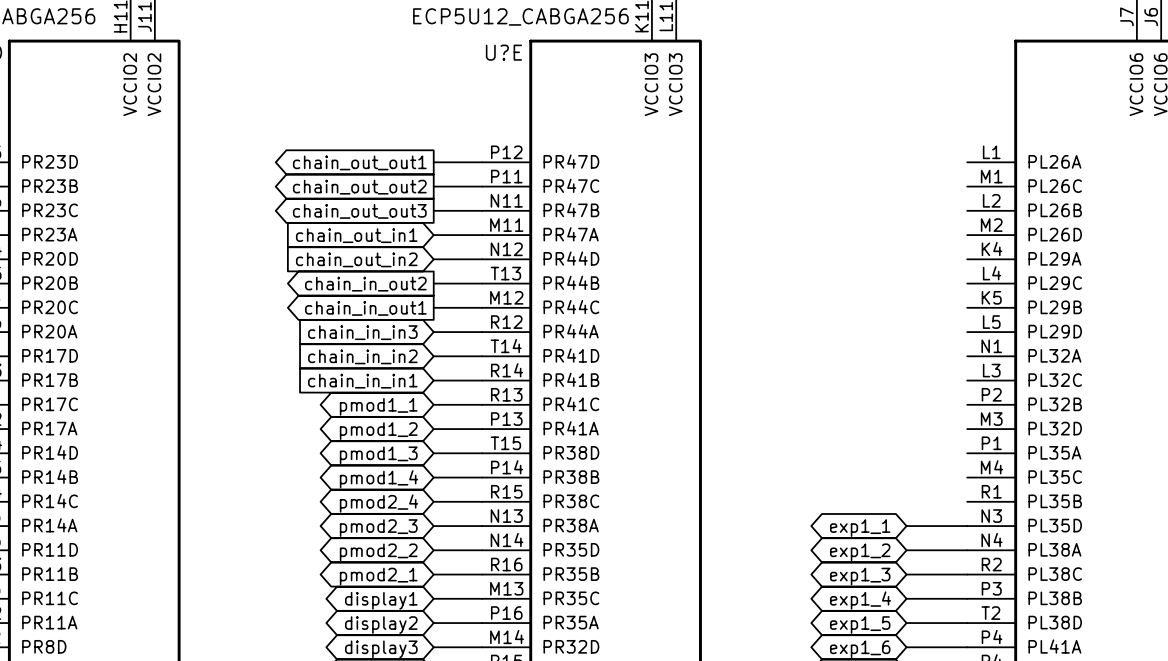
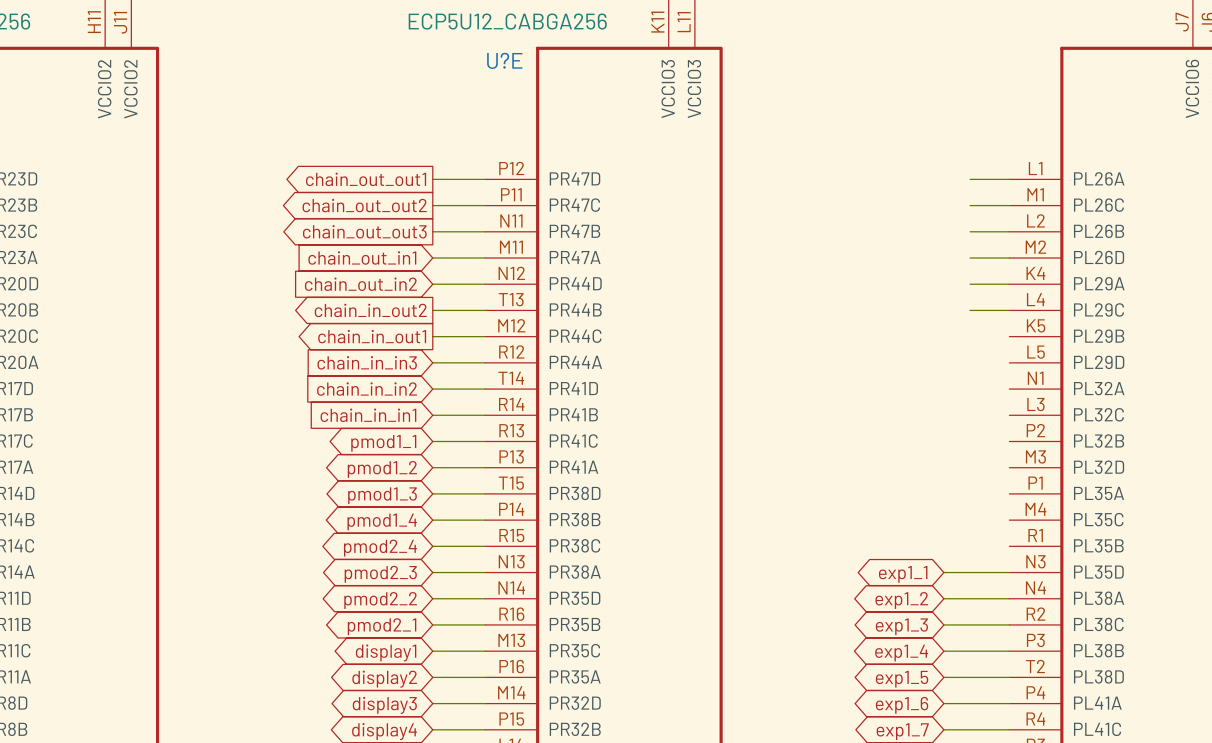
wire: none -> (970, 179) (1009, 179)
wire: none -> (970, 205) (1009, 205)
wire: none -> (970, 231) (1009, 231)
wire: none -> (970, 258) (1009, 258)
wire: none -> (970, 284) (1009, 284)
wire: none -> (970, 310) (1009, 310)

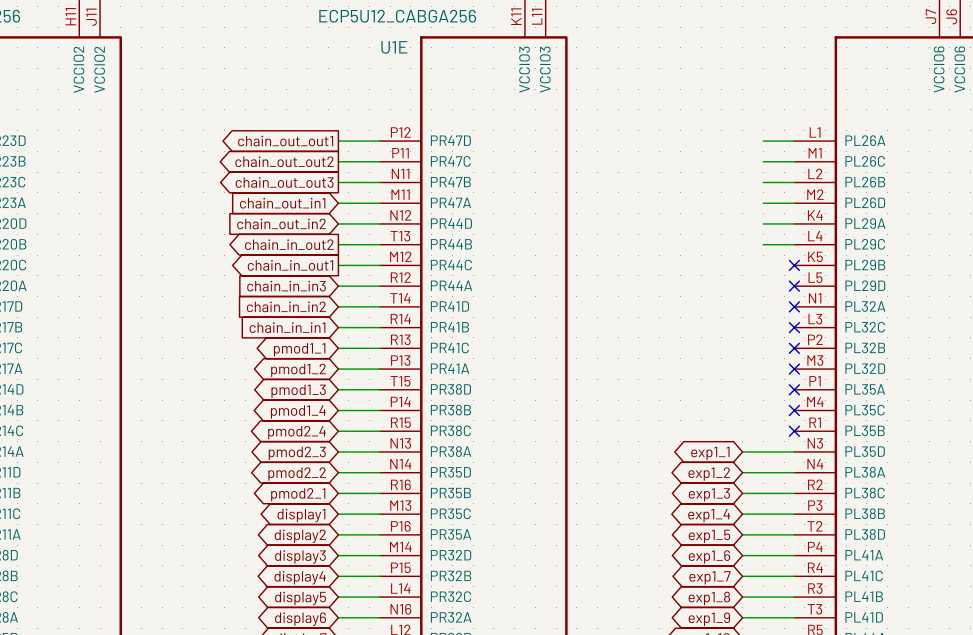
U?E name: U?E (504, 60) -> U1E (394, 47)
no-connect mark: none -> (794, 265)
no-connect mark: none -> (794, 286)
no-connect mark: none -> (794, 306)
no-connect mark: none -> (794, 327)
no-connect mark: none -> (794, 348)
no-connect mark: none -> (794, 369)
no-connect mark: none -> (794, 389)
no-connect mark: none -> (794, 410)
no-connect mark: none -> (794, 431)

